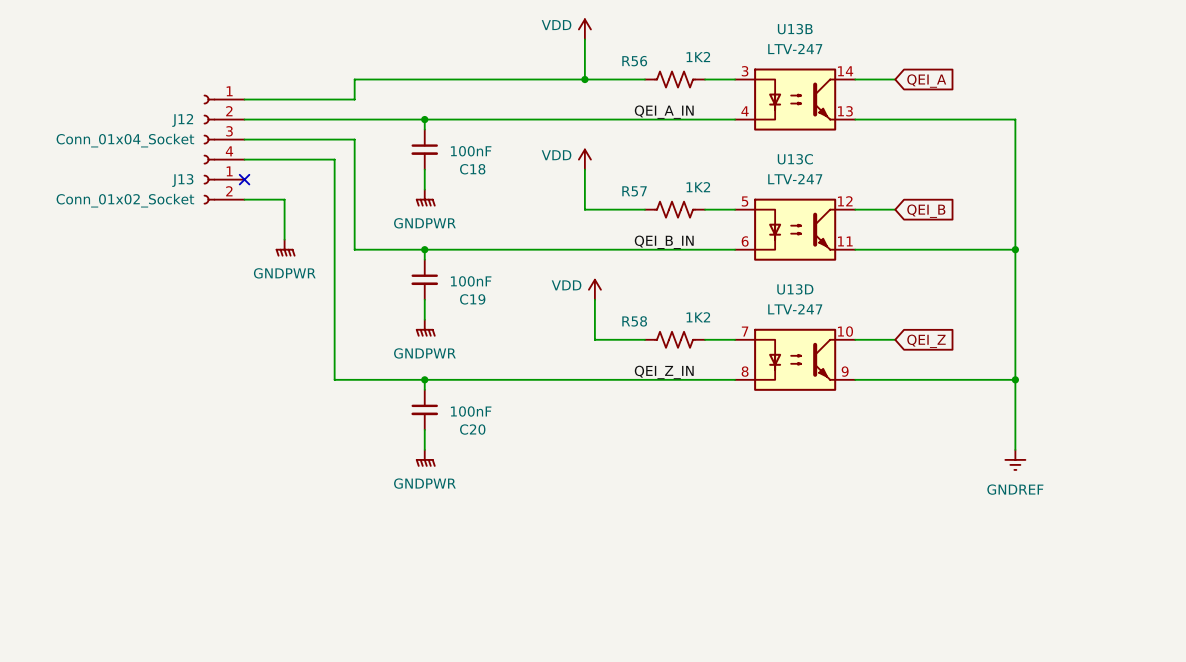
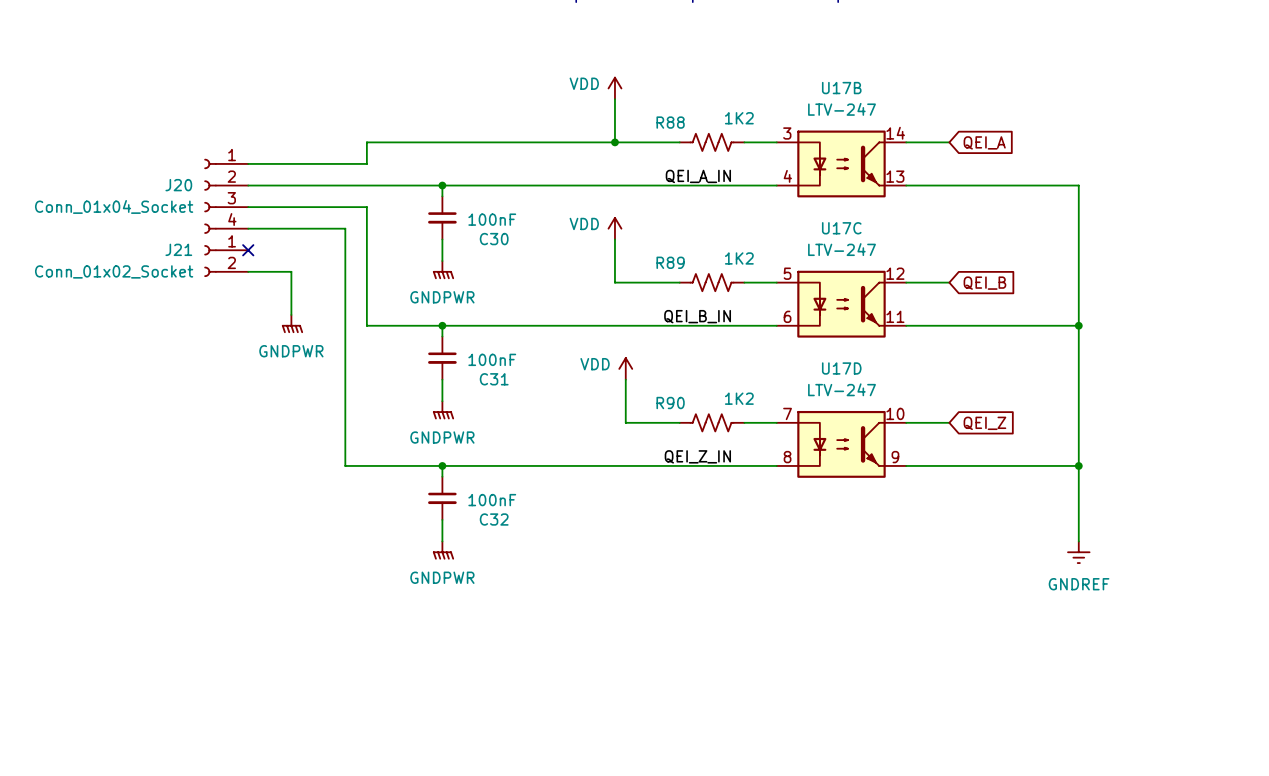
U13B name: U13B (795, 29) -> U17B (841, 88)
R56 name: R56 (634, 61) -> R88 (670, 122)
J12 name: J12 (182, 120) -> J20 (178, 185)
U13C name: U13C (795, 159) -> U17C (841, 228)
C18 name: C18 (472, 169) -> C30 (494, 239)
J13 name: J13 (182, 180) -> J21 (178, 249)
R57 name: R57 (634, 191) -> R89 (670, 262)
U13D name: U13D (795, 289) -> U17D (841, 368)
C19 name: C19 (472, 299) -> C31 (494, 379)
R58 name: R58 (634, 321) -> R90 (670, 403)
C20 name: C20 (472, 429) -> C32 (494, 519)

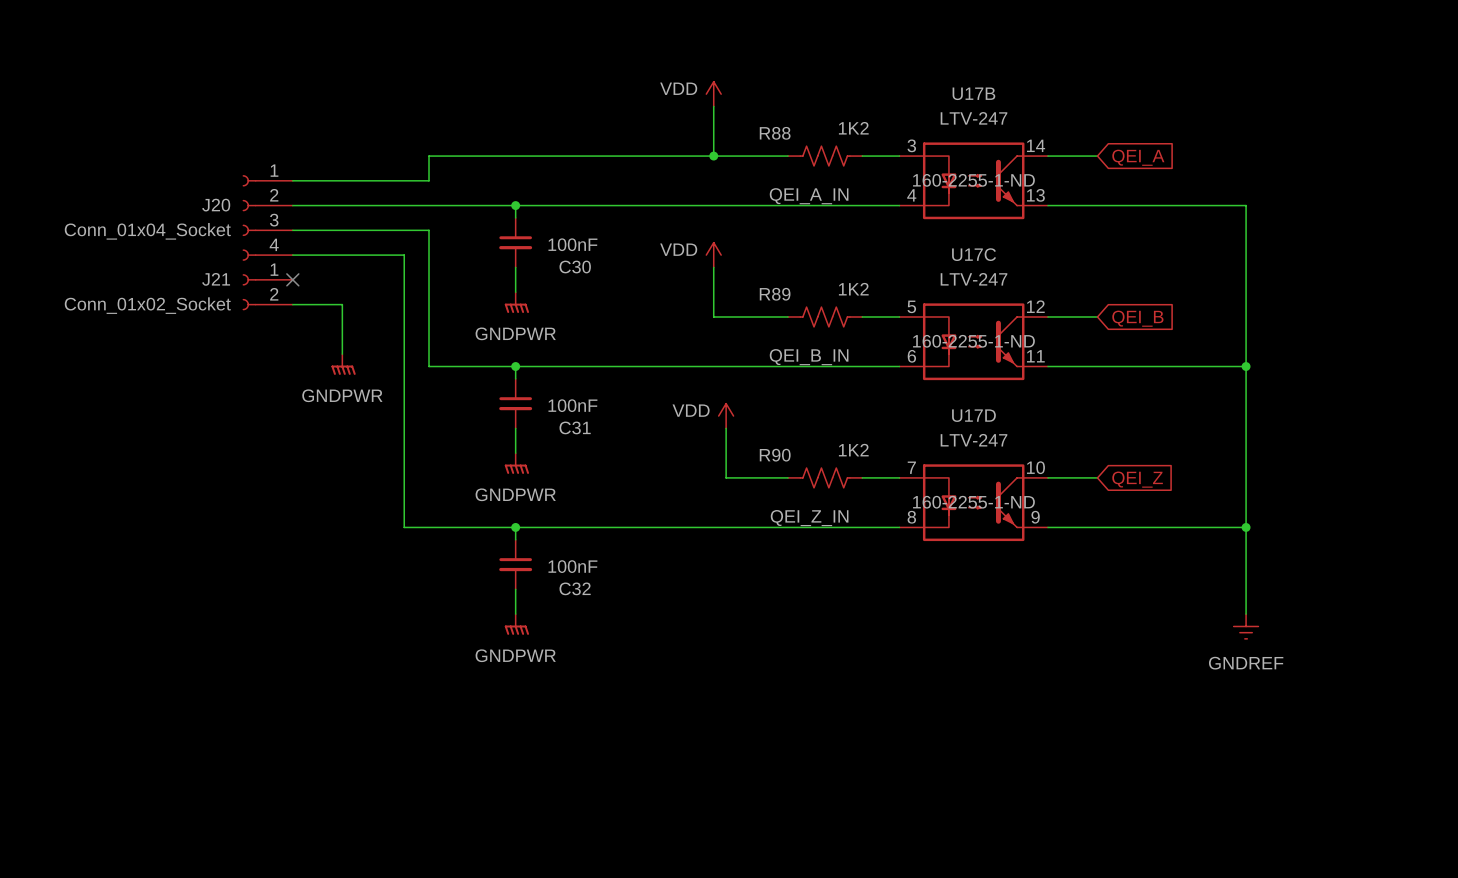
U17B text: none -> 160-2255-1-ND (973, 180)
U17C text: none -> 160-2255-1-ND (973, 341)
U17D text: none -> 160-2255-1-ND (973, 502)

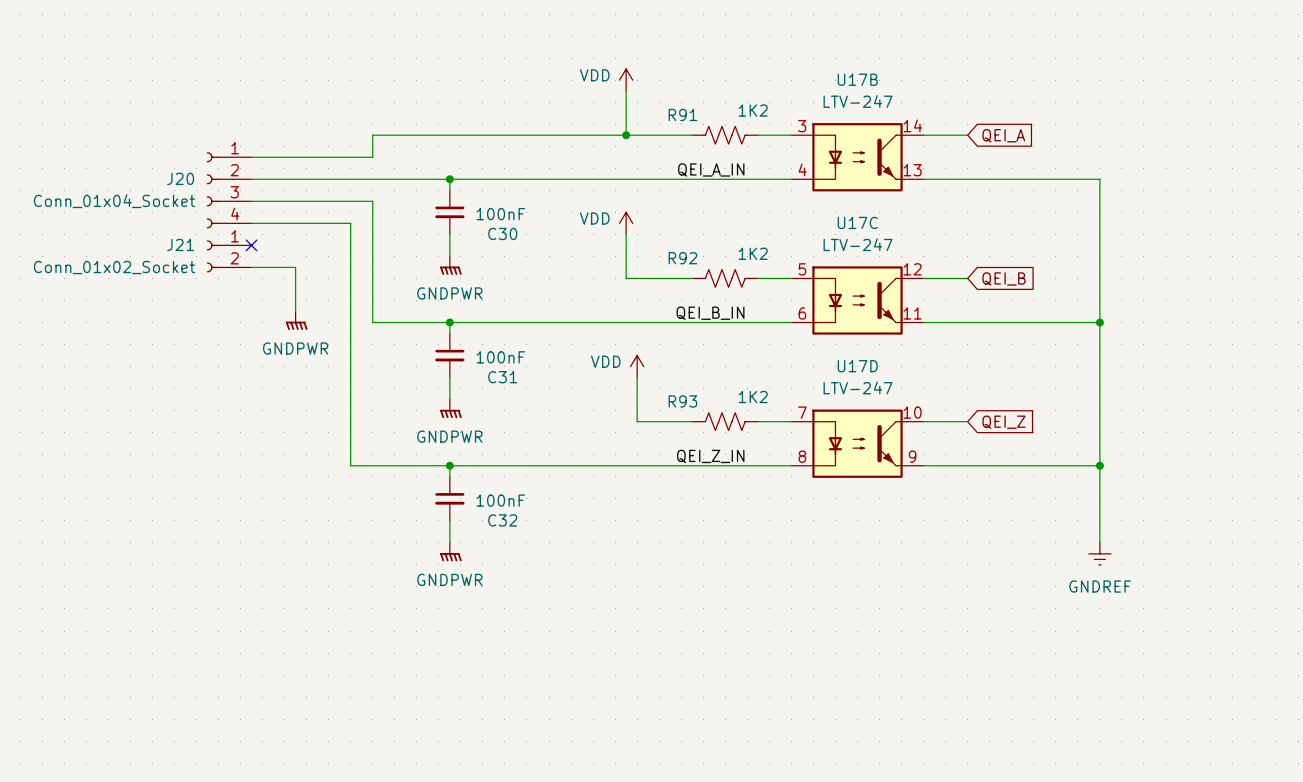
R88 name: R88 (775, 133) -> R91 (682, 114)
U17B text: 160-2255-1-ND (973, 180) -> none
R89 name: R89 (775, 294) -> R92 (682, 258)
U17C text: 160-2255-1-ND (973, 341) -> none
R90 name: R90 (775, 455) -> R93 (682, 401)
U17D text: 160-2255-1-ND (973, 502) -> none

